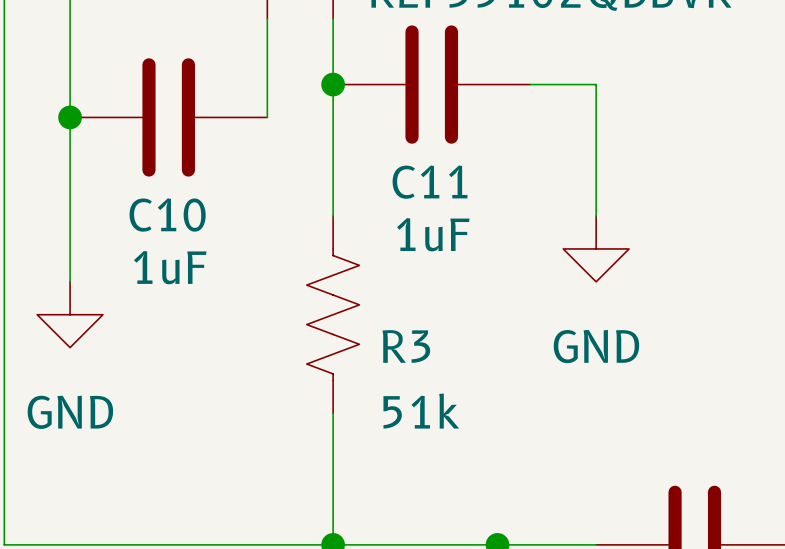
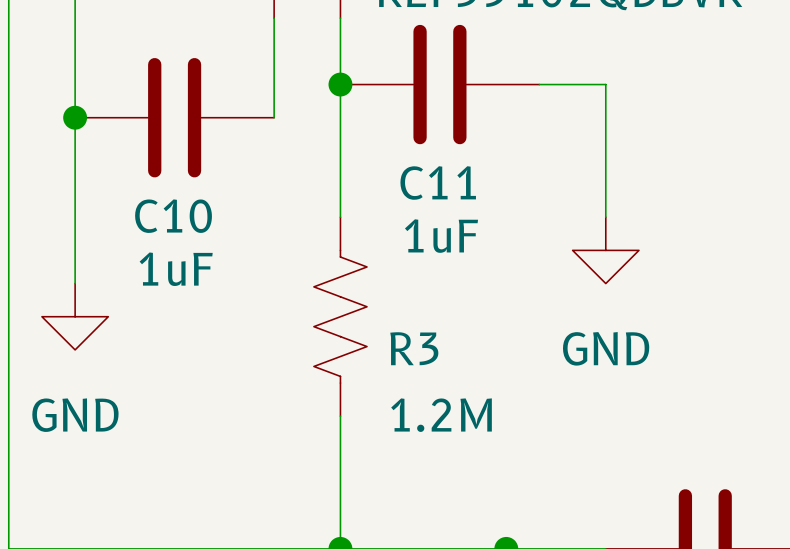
R3 value: 51k (421, 411) -> 1.2M (441, 415)

